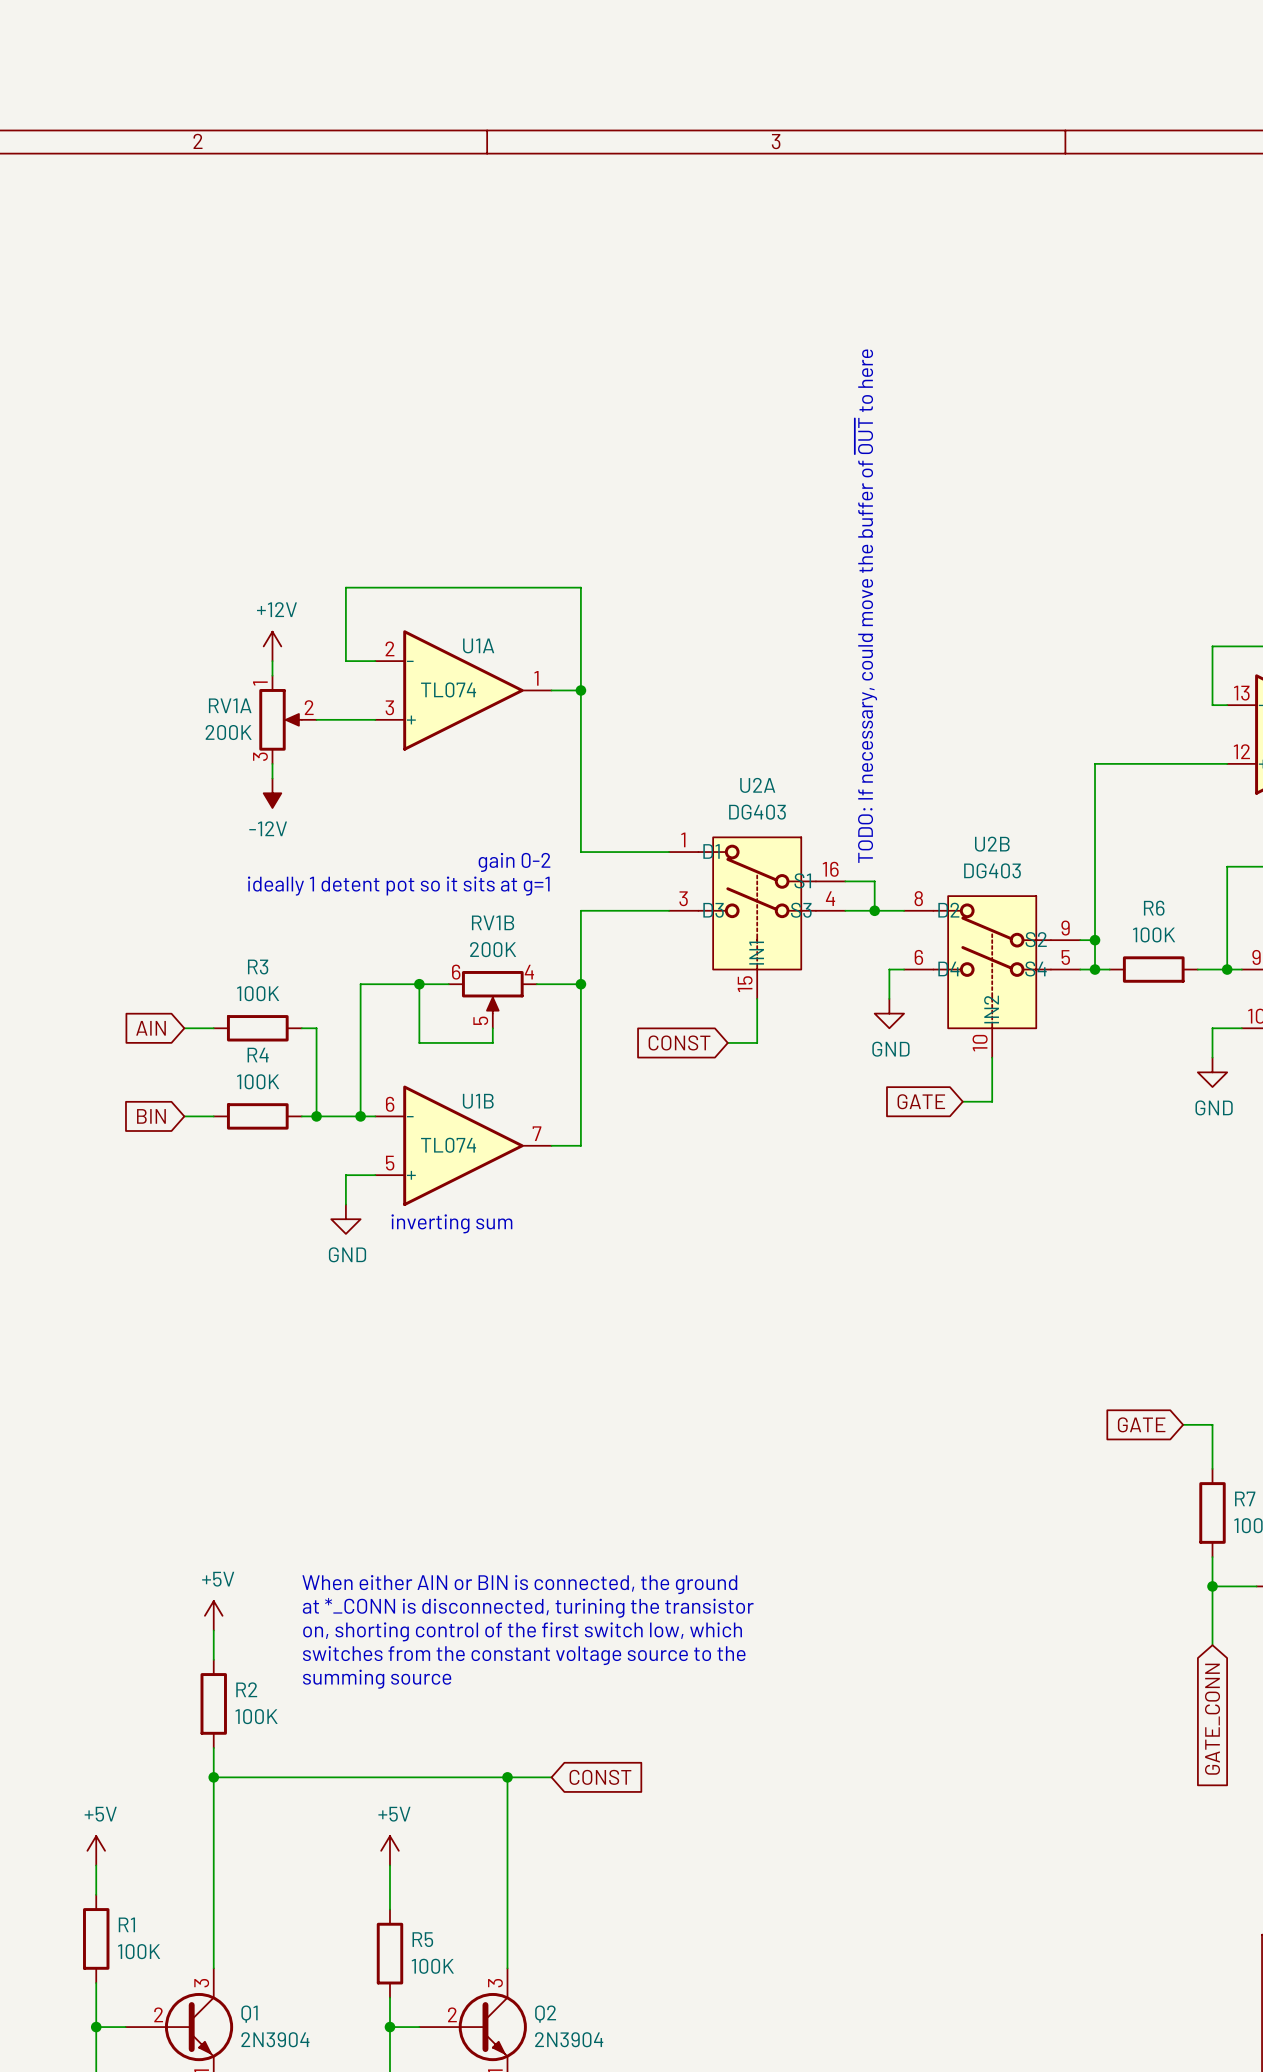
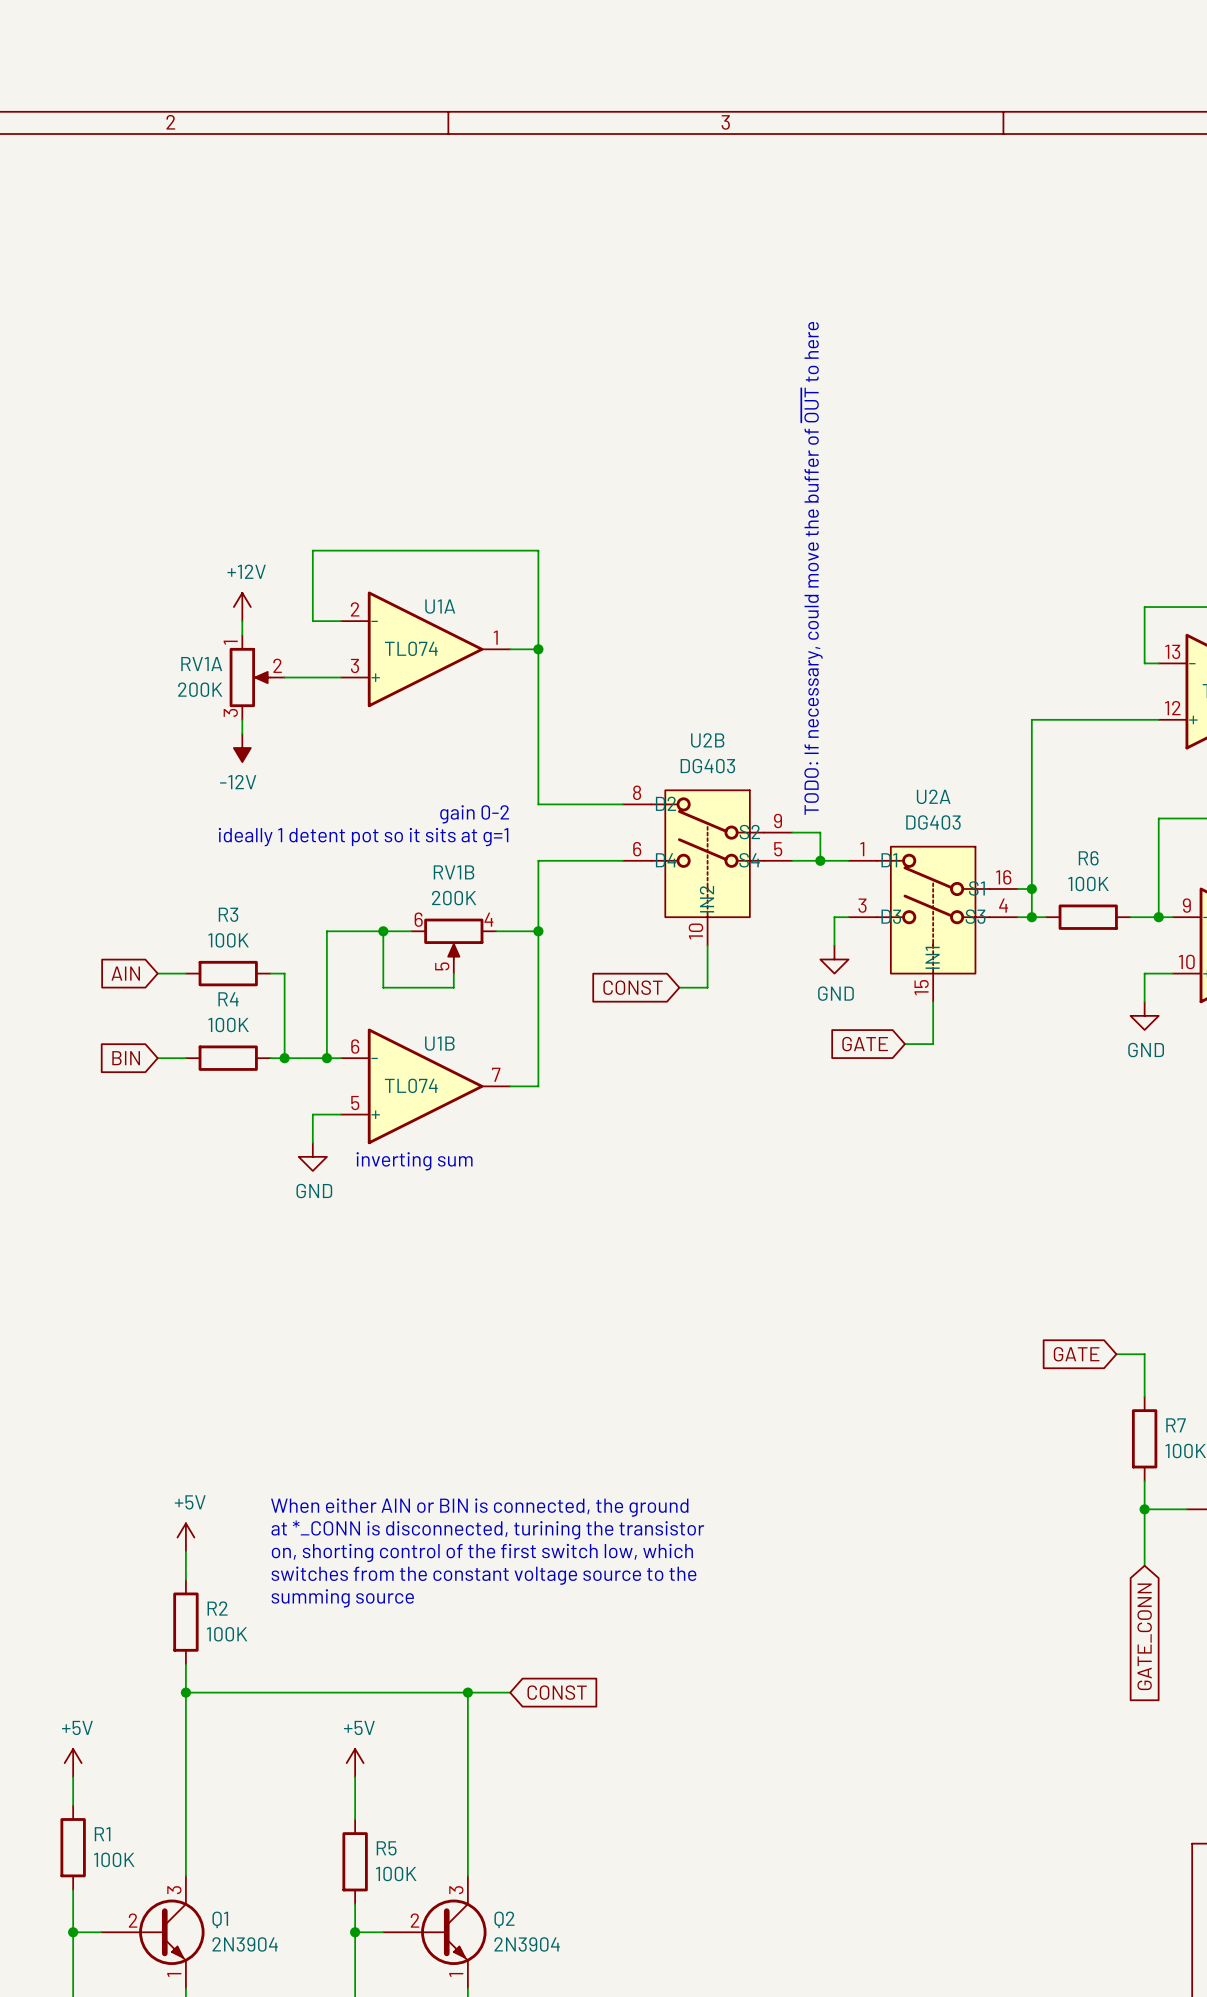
U2A position: (757, 918) -> (933, 924)
U2B position: (992, 976) -> (707, 867)

